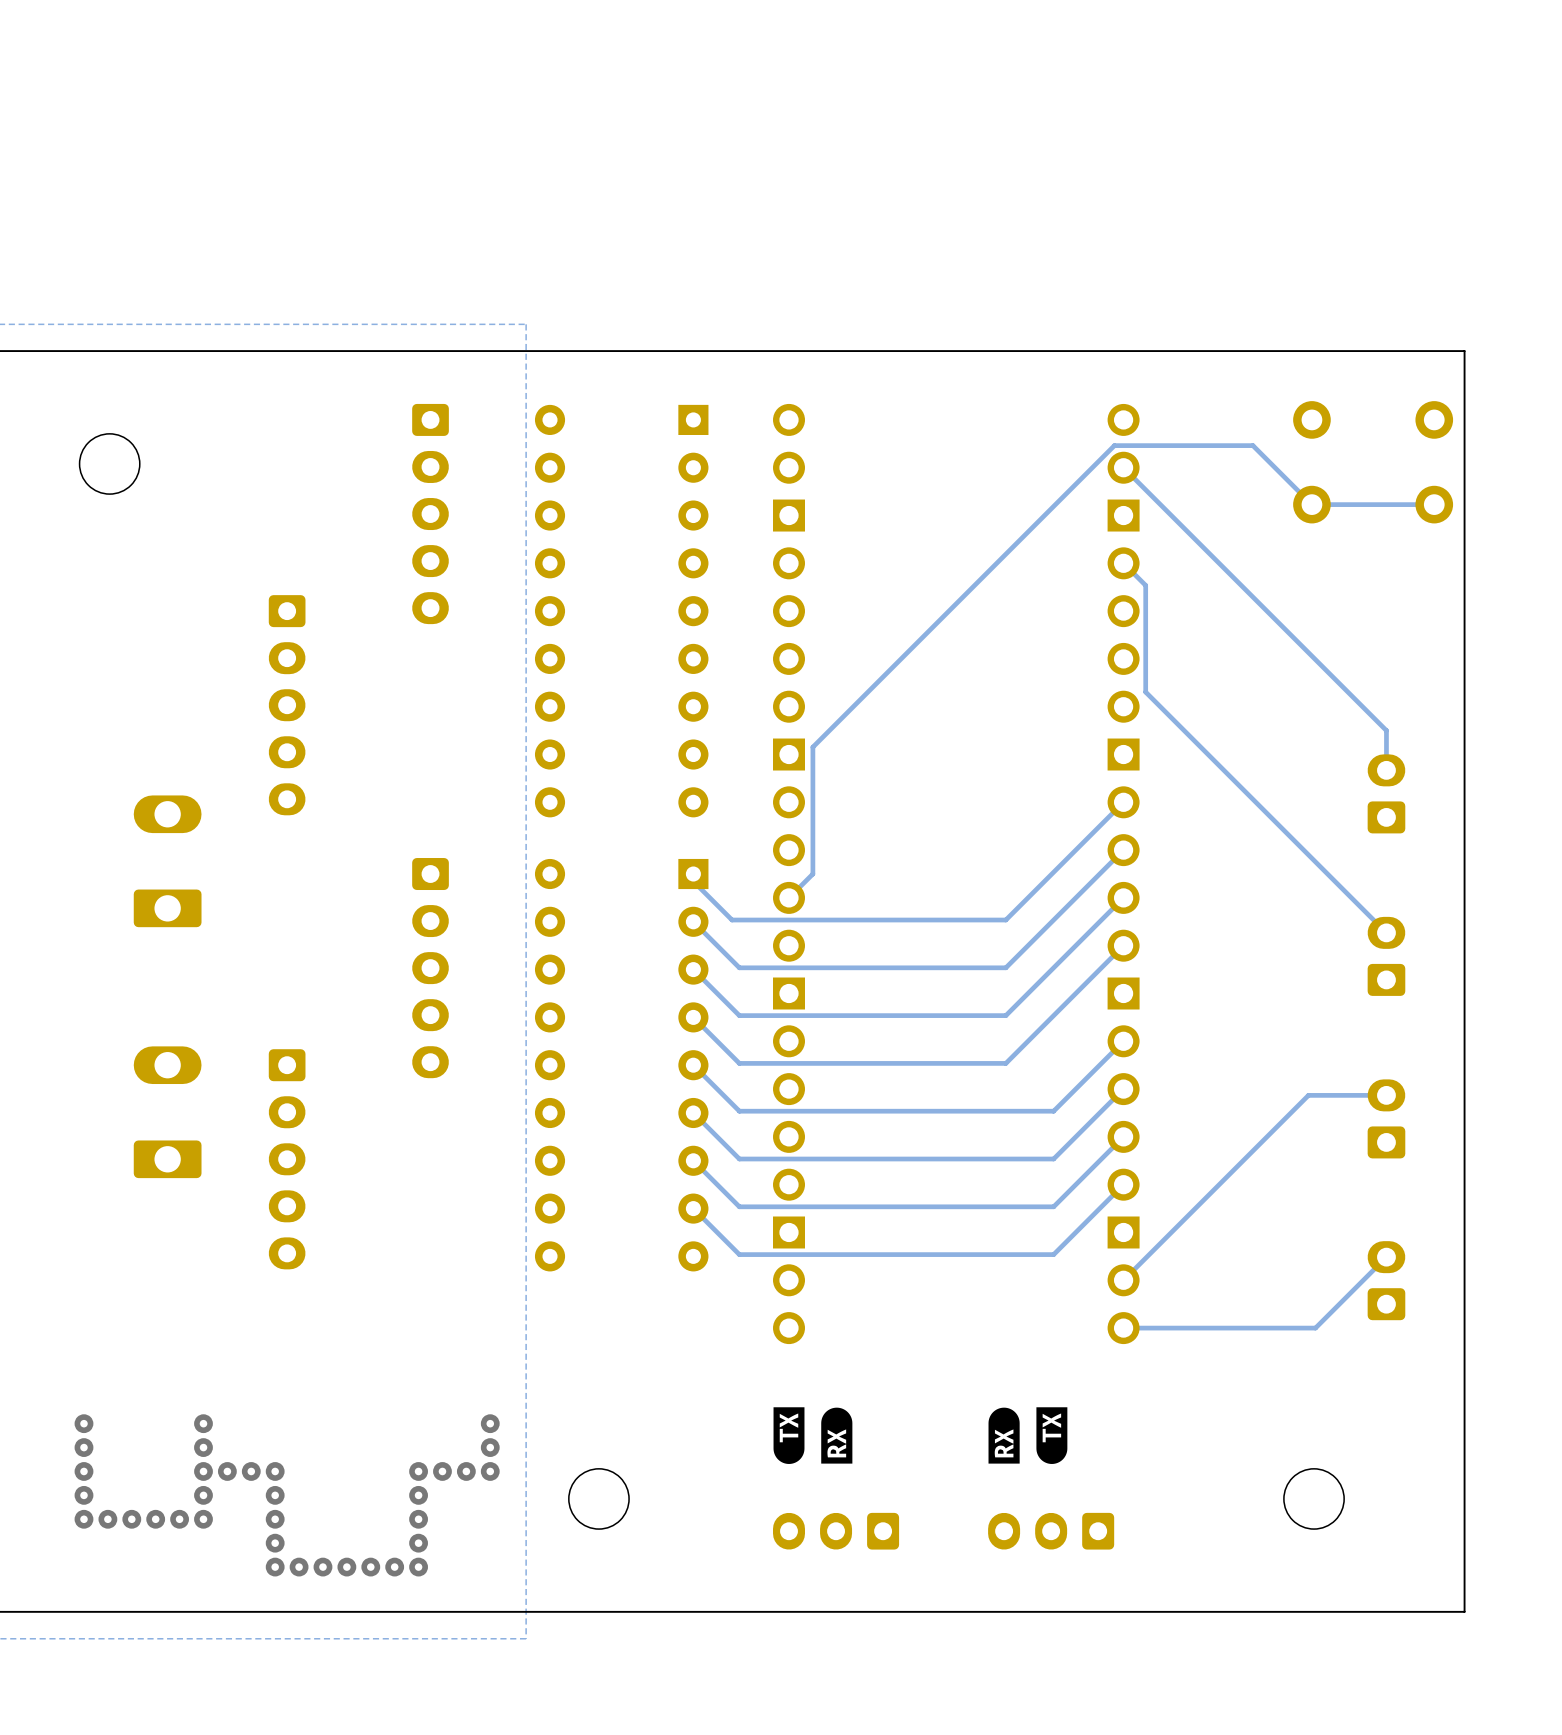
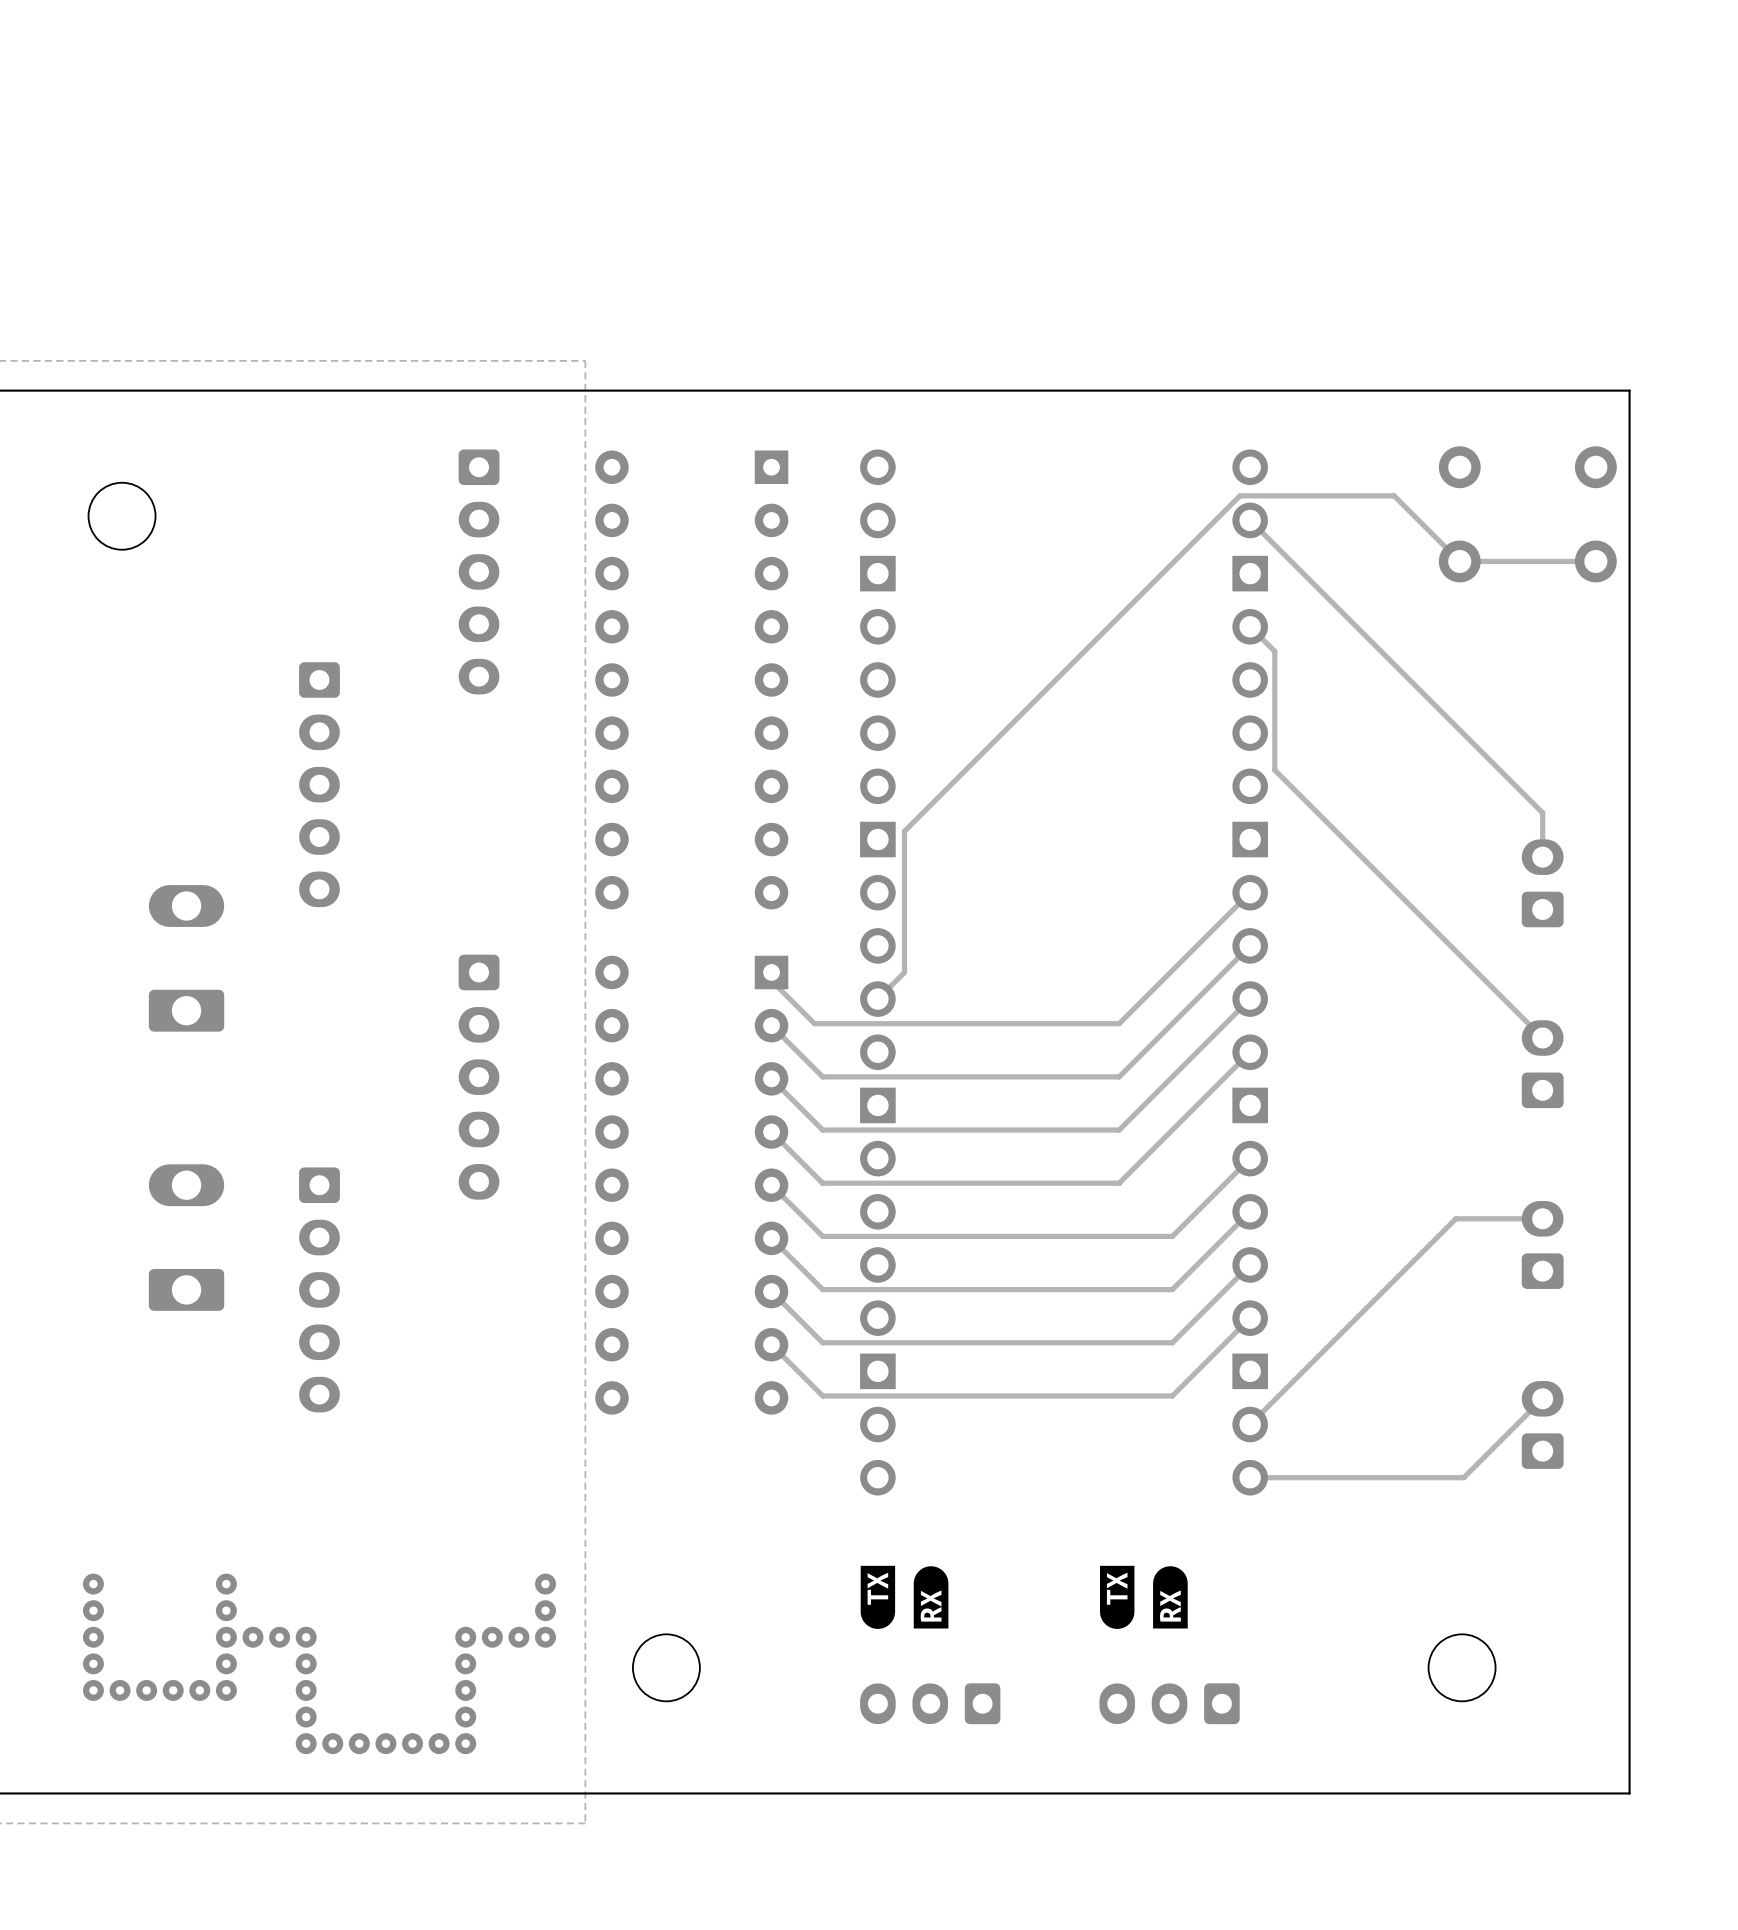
drawing position: (1004, 1435) -> (1170, 1597)
drawing position: (1051, 1435) -> (1117, 1597)

